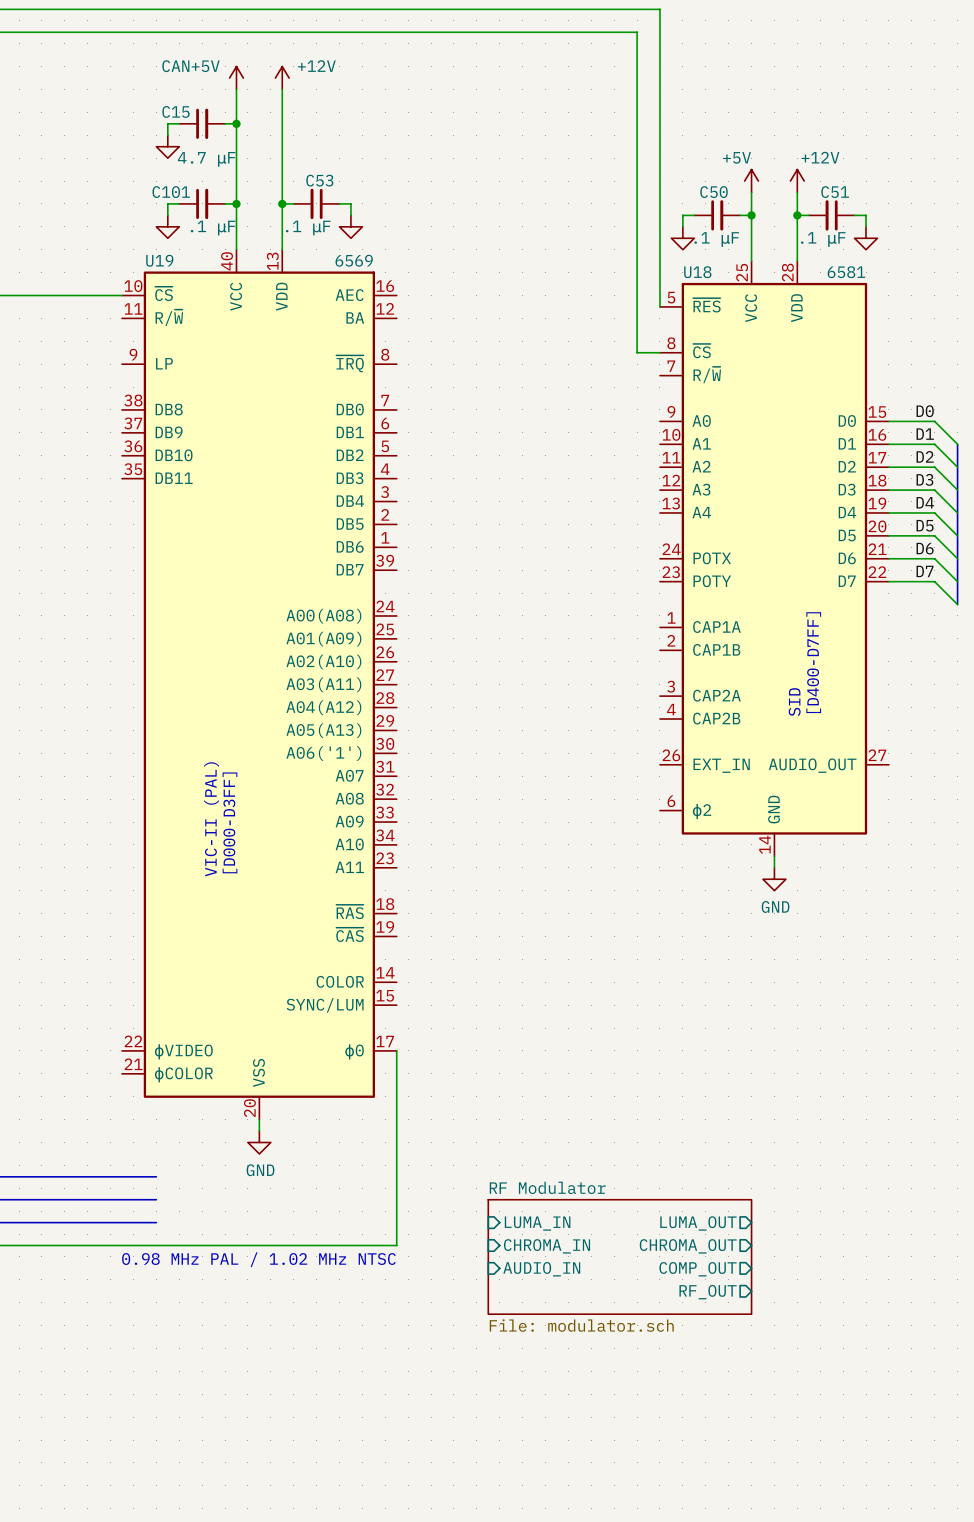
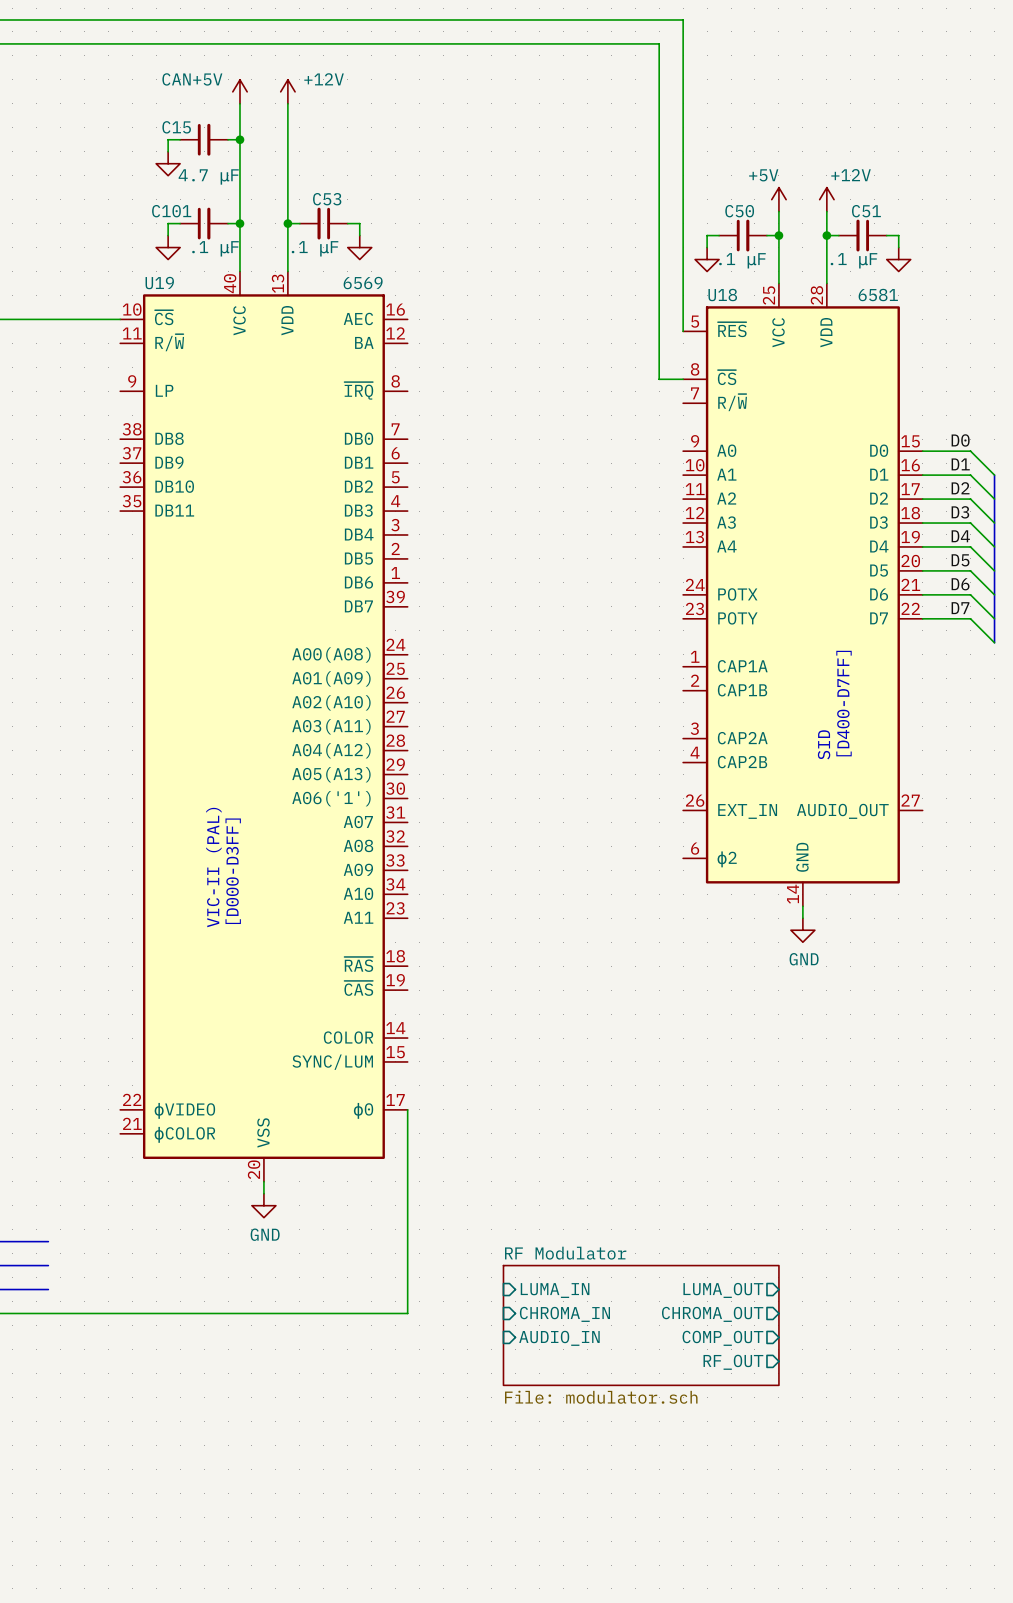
bus: (53, 1176) (156, 1176) -> none
bus: (53, 1199) (156, 1199) -> none
bus: (53, 1222) (156, 1222) -> none
text: 0.98 MHz PAL / 1.02 MHz NTSC (258, 1259) -> none

